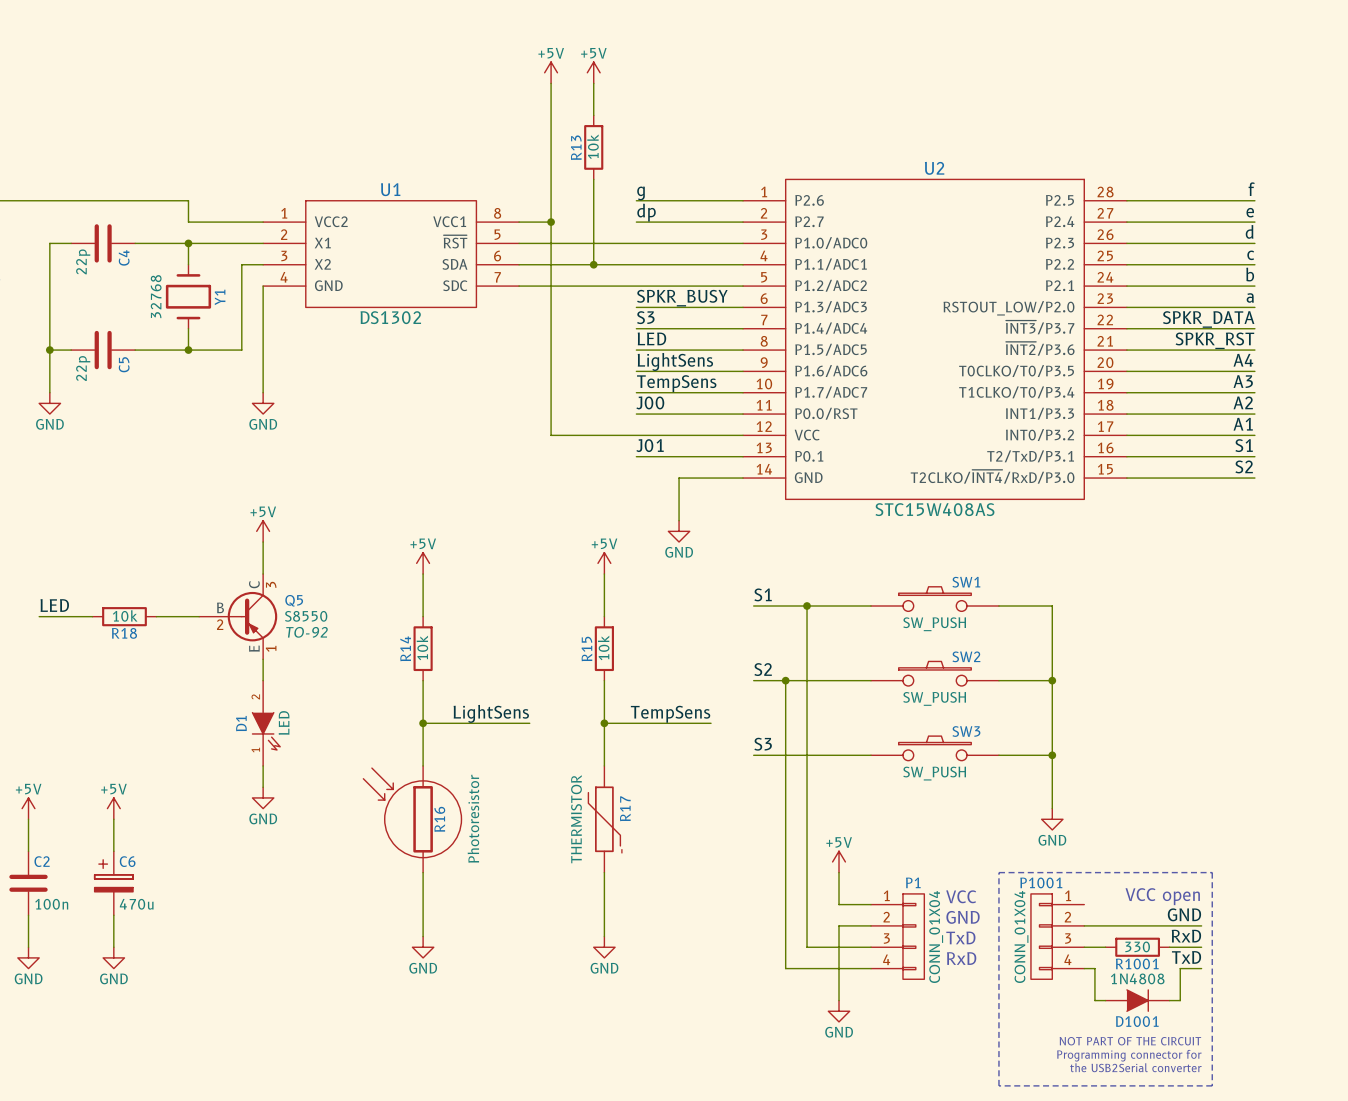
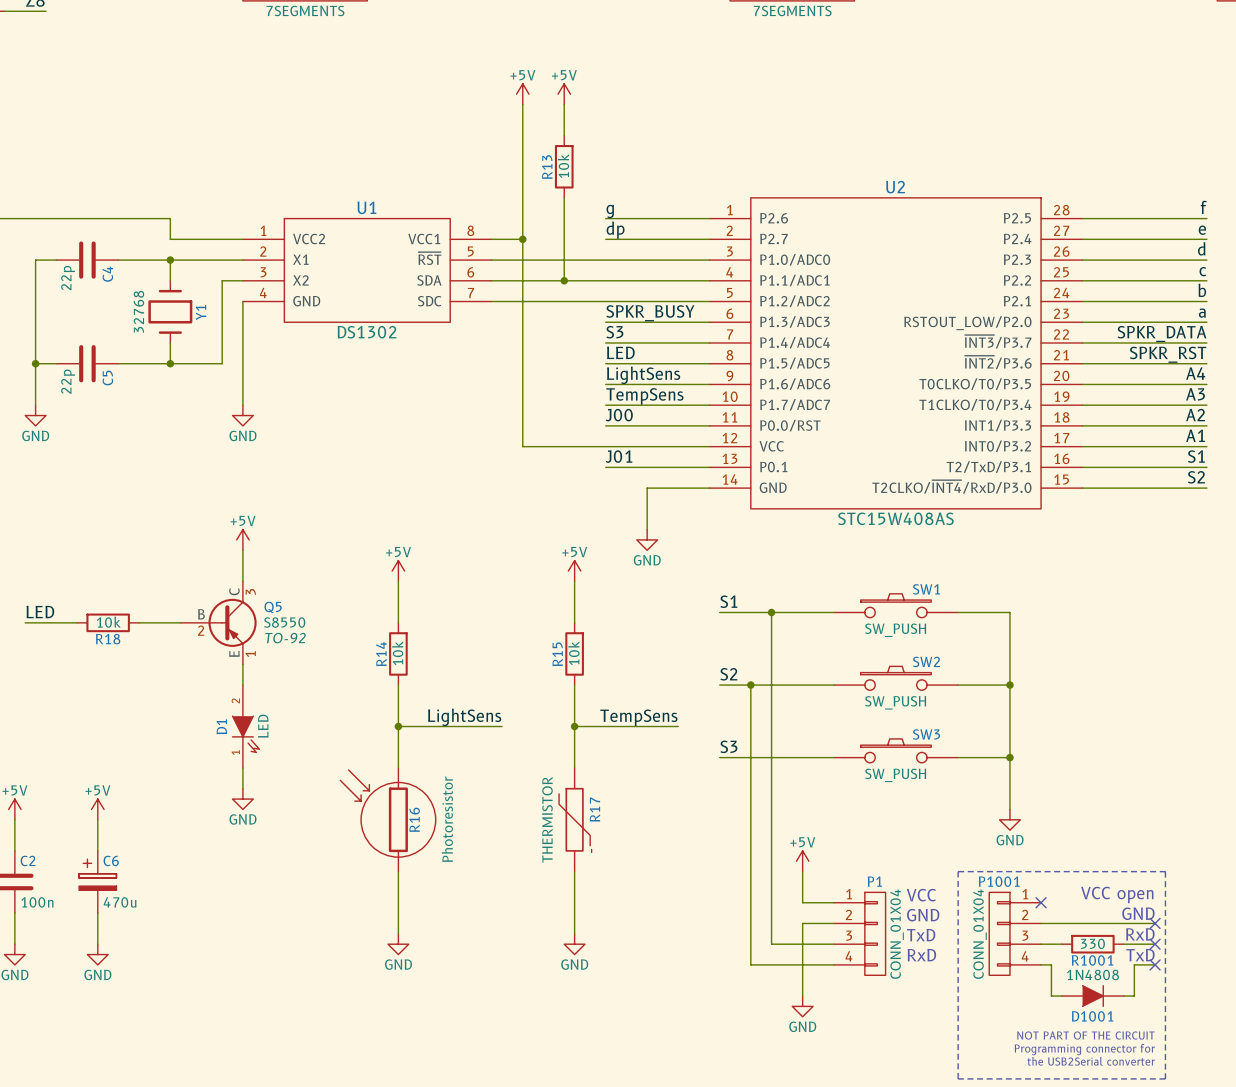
no-connect mark: none -> (1041, 902)
label: GND (1184, 914) -> none
text: none -> GND (1138, 913)
no-connect mark: none -> (1155, 923)
label: RxD (1186, 936) -> none
text: none -> RxD (1140, 934)
no-connect mark: none -> (1155, 944)
label: TxD (1186, 957) -> none
text: none -> TxD (1140, 955)
no-connect mark: none -> (1155, 964)

